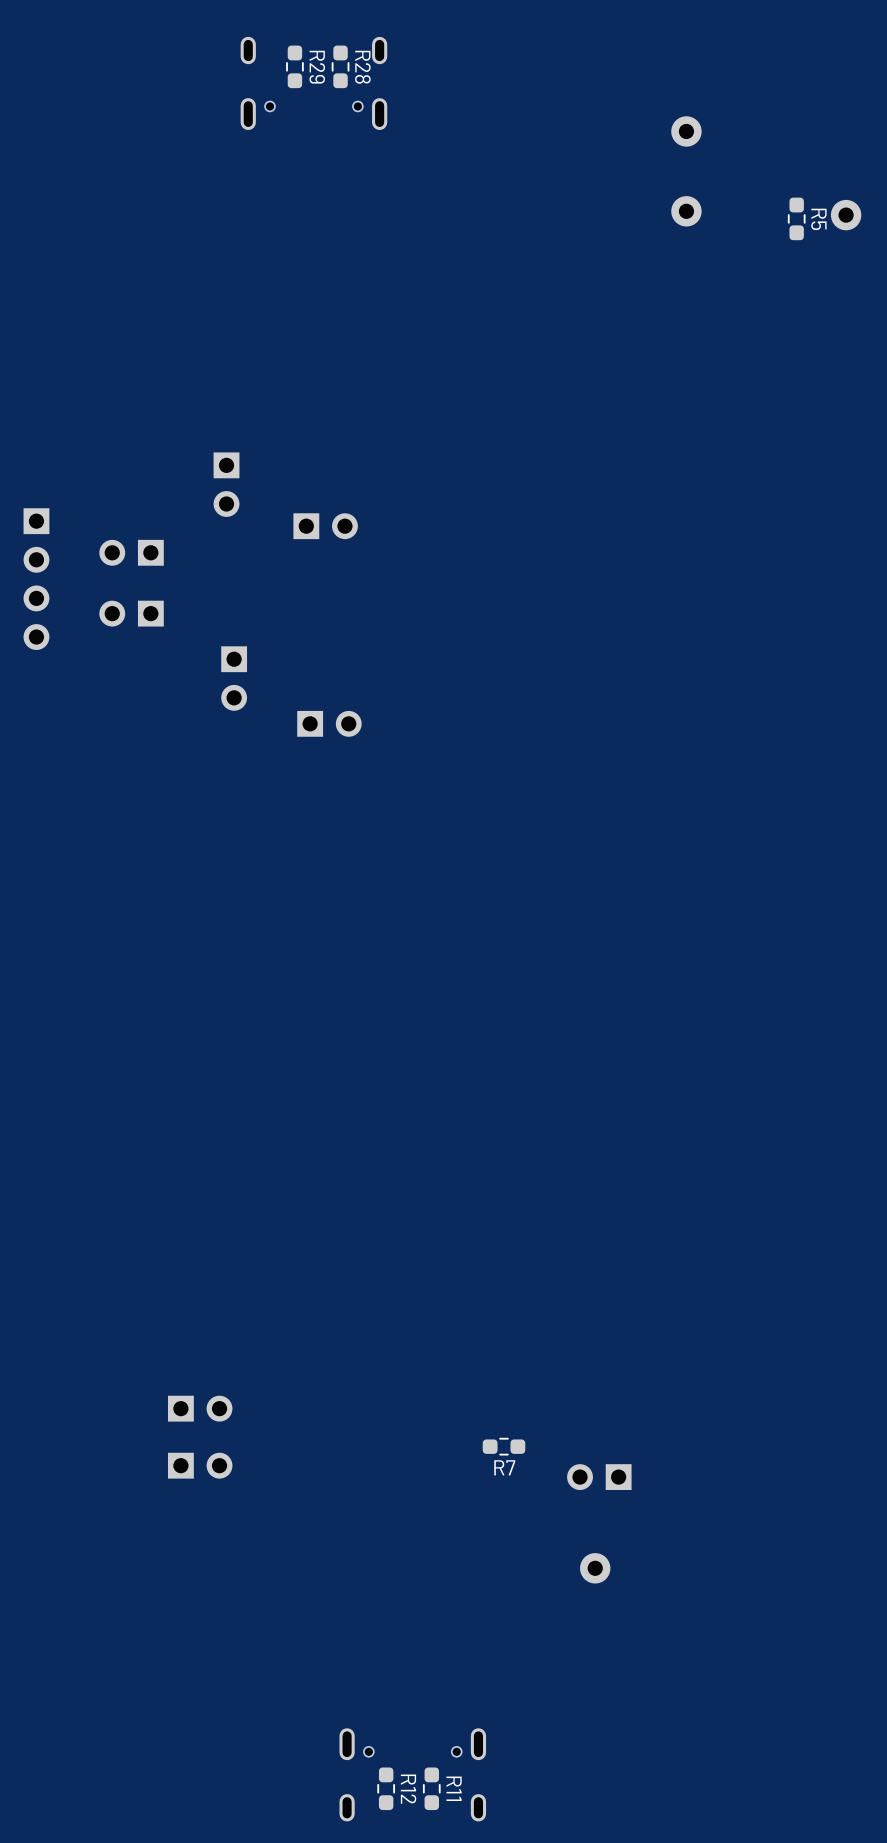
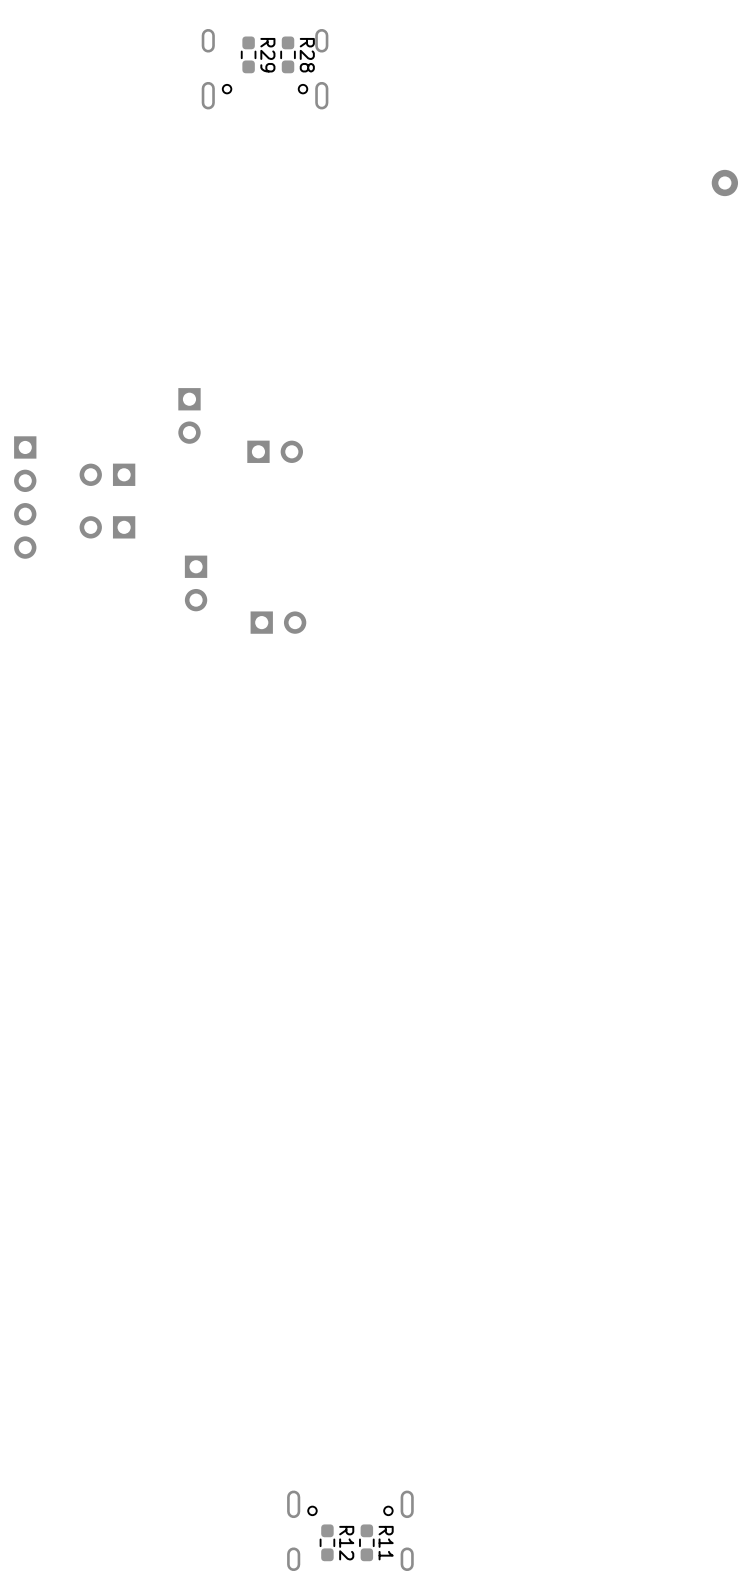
part: (686, 131) -> none
part: (686, 211) -> none
R5: (796, 218) -> none
part: (200, 1408) -> none
R7: (504, 1446) -> none
part: (200, 1465) -> none
part: (599, 1477) -> none
part: (595, 1568) -> none

